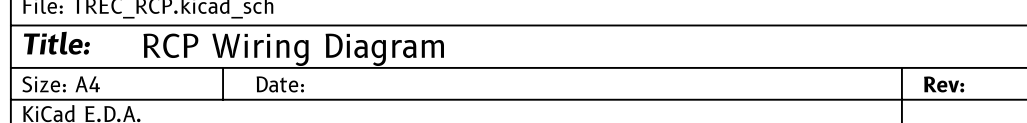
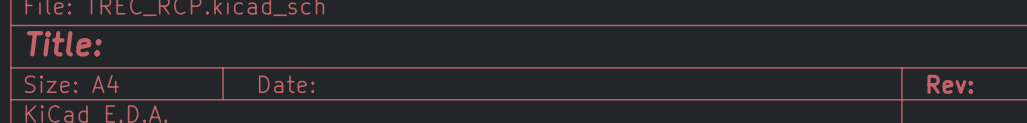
text: RCP Wiring Diagram (293, 49) -> none

